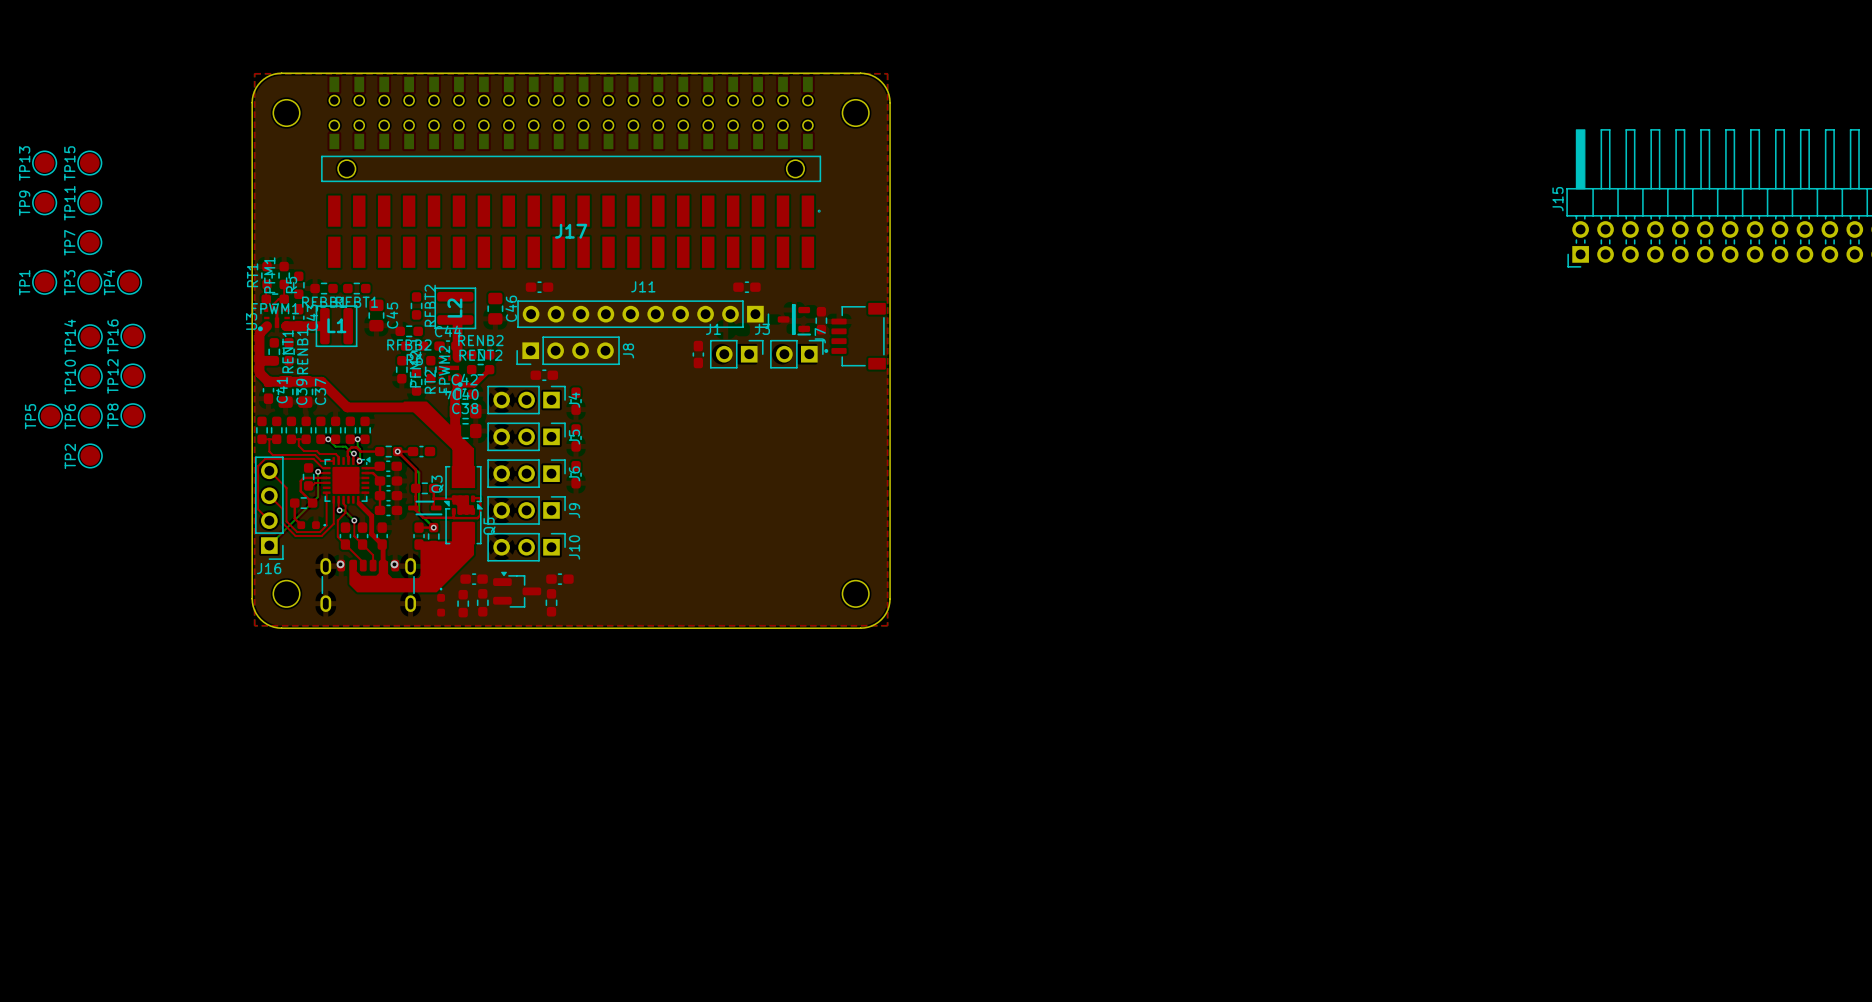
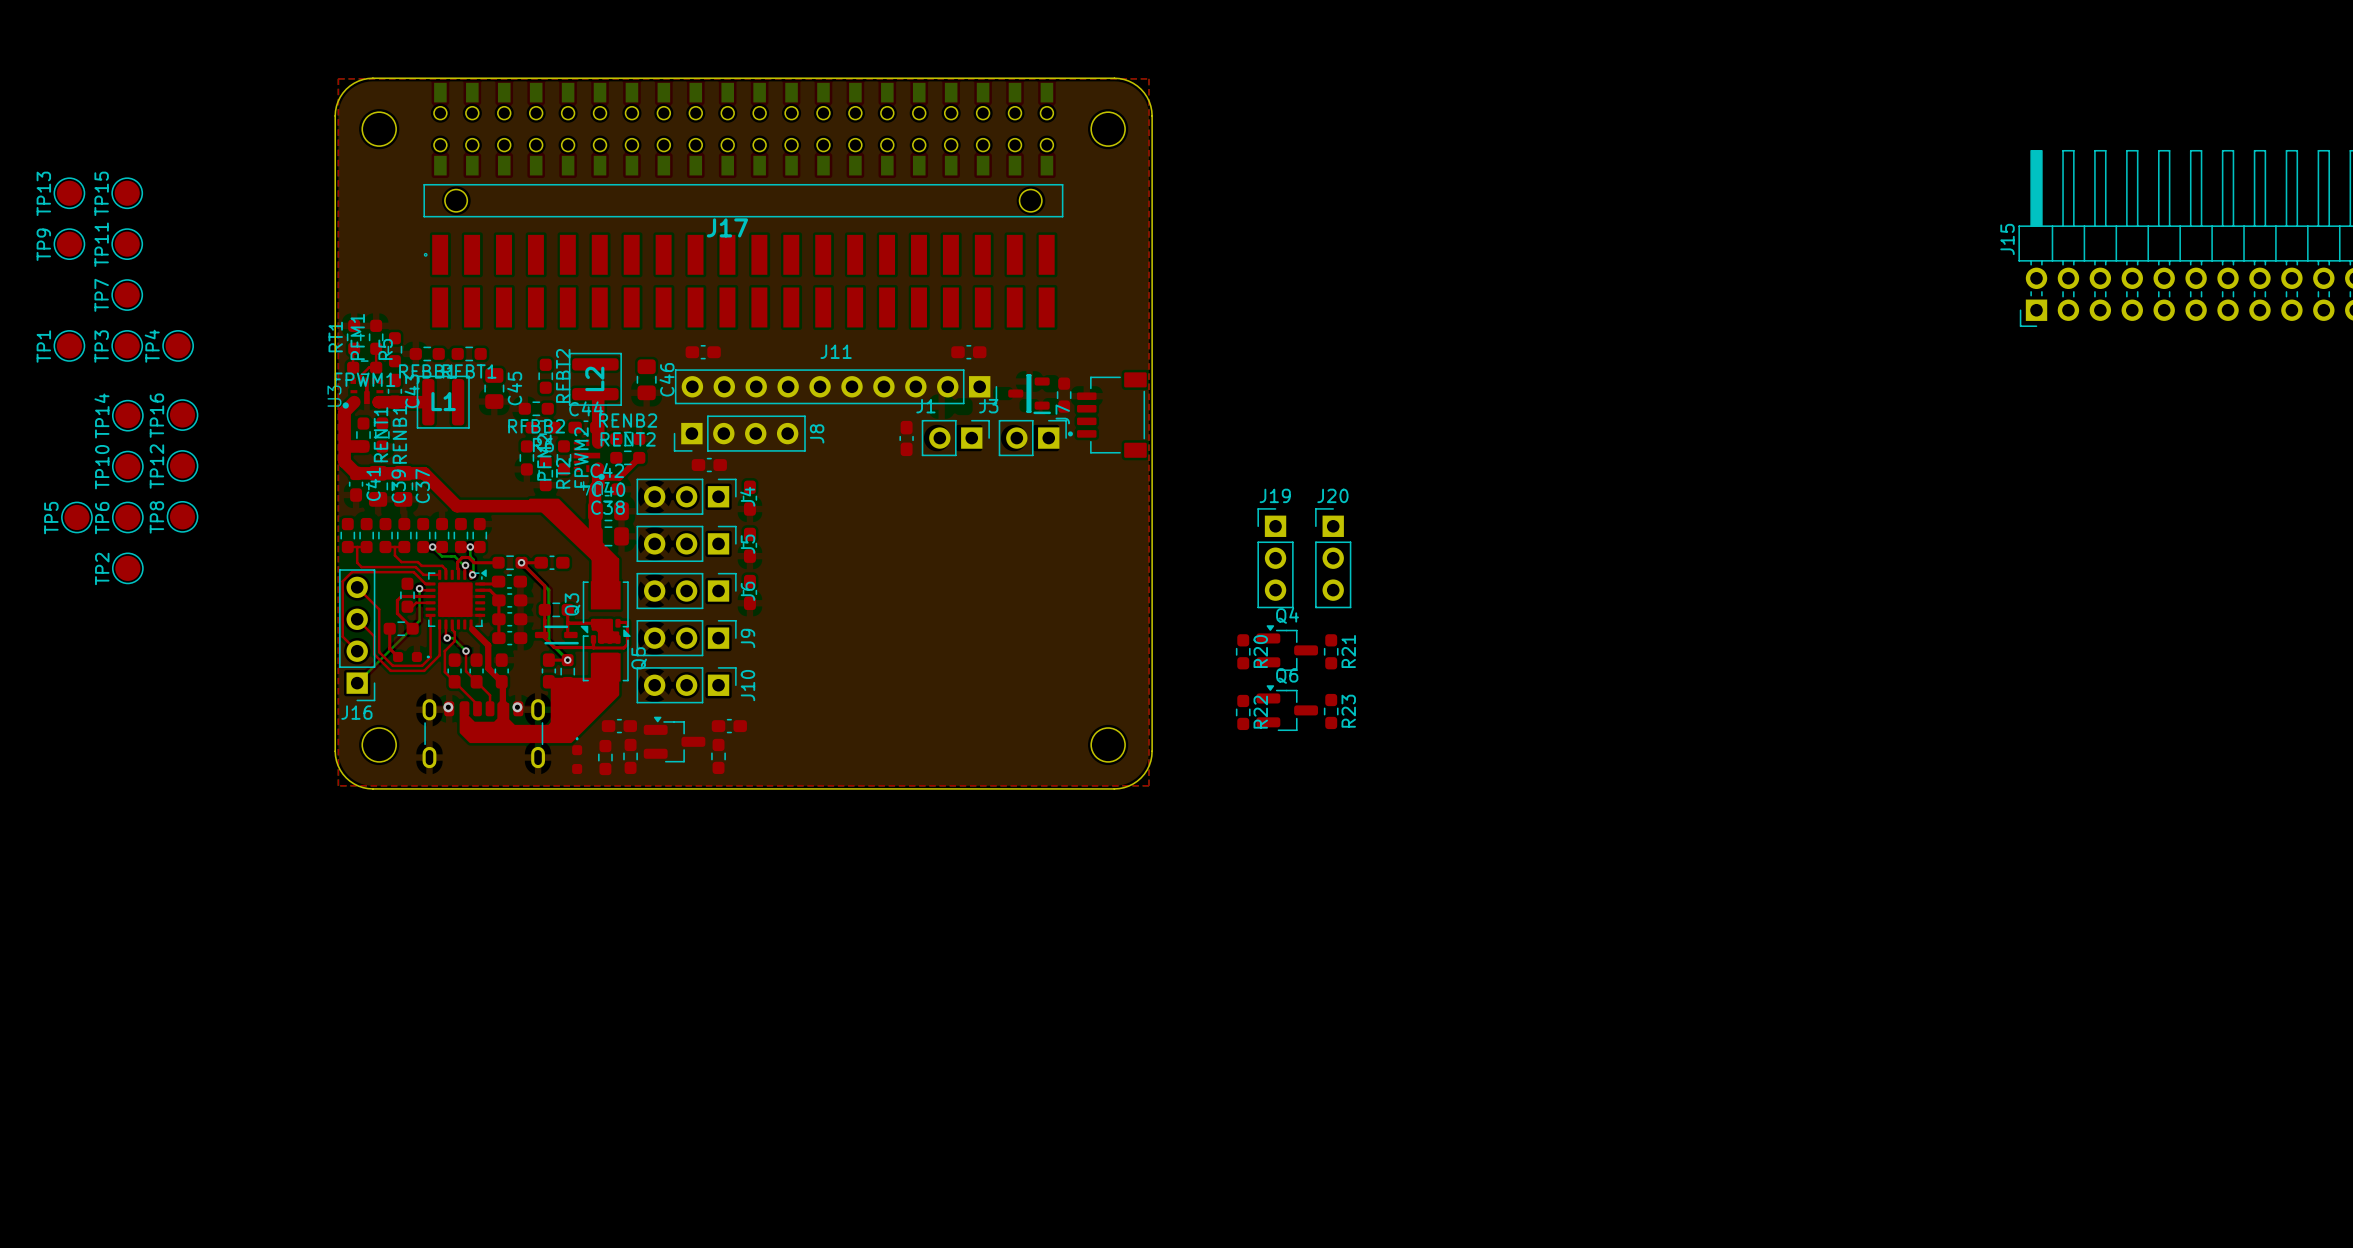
J17 footprint: [321, 155, 821, 268] -> [423, 184, 1064, 328]
J17 name position: J17 (571, 231) -> J17 (727, 227)
J19: none -> (1275, 558)
J20: none -> (1333, 558)
Q4: none -> (1287, 648)
R20: none -> (1243, 651)
R21: none -> (1331, 651)
Q6: none -> (1287, 708)
R23: none -> (1331, 711)
R22: none -> (1243, 712)

